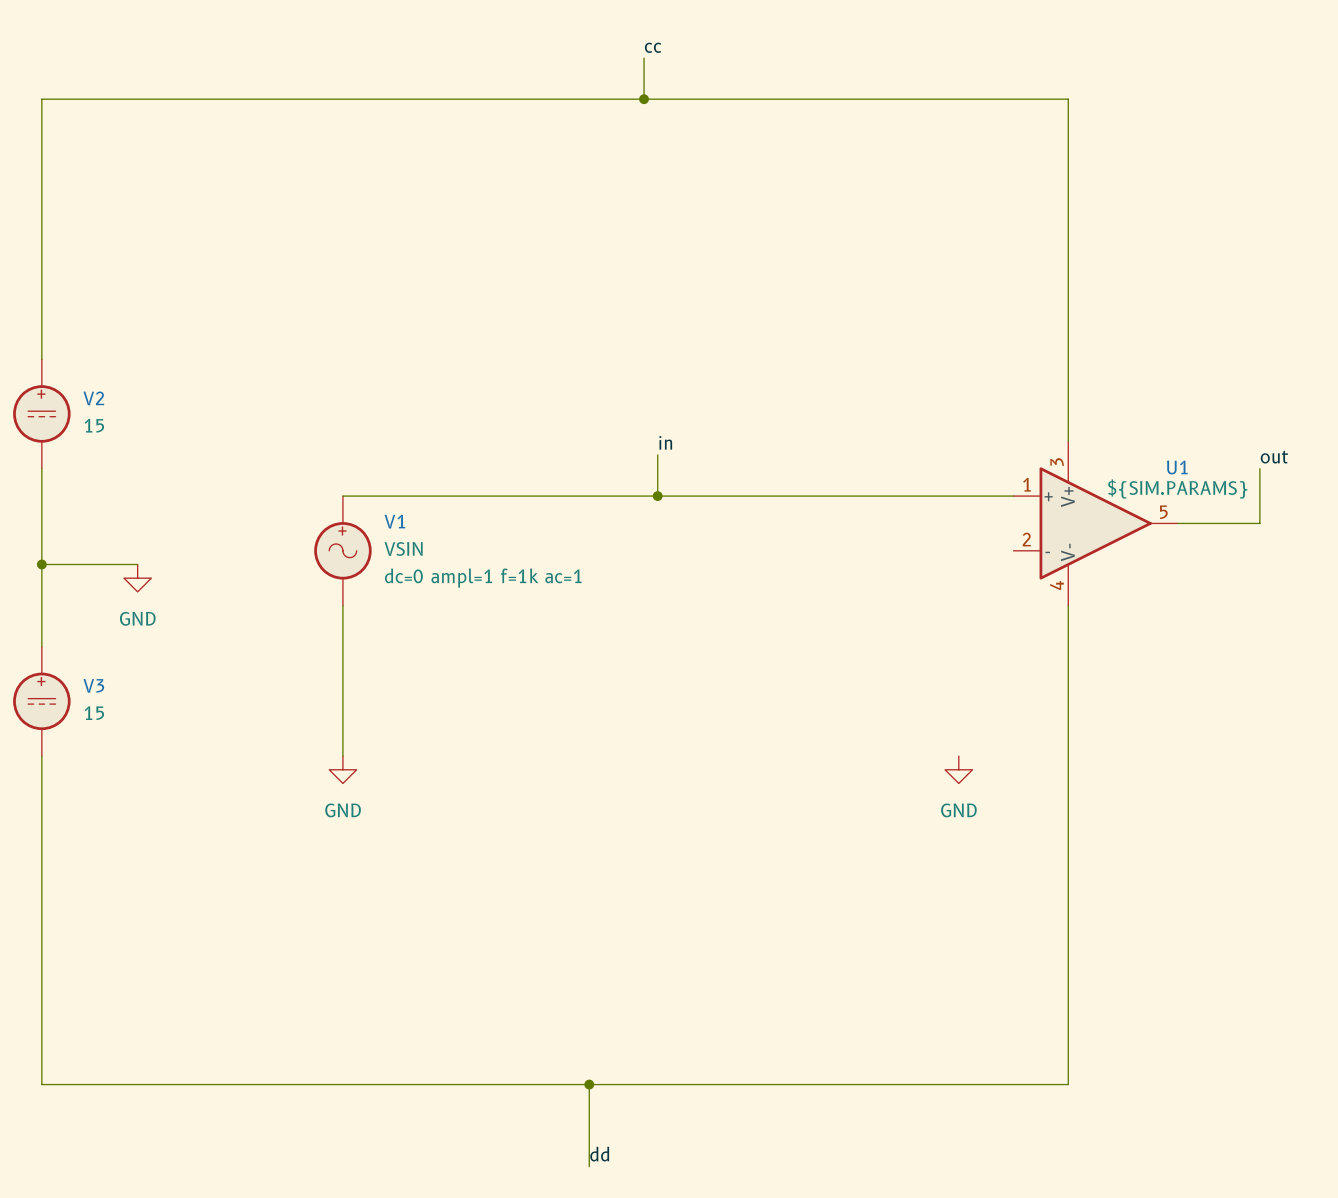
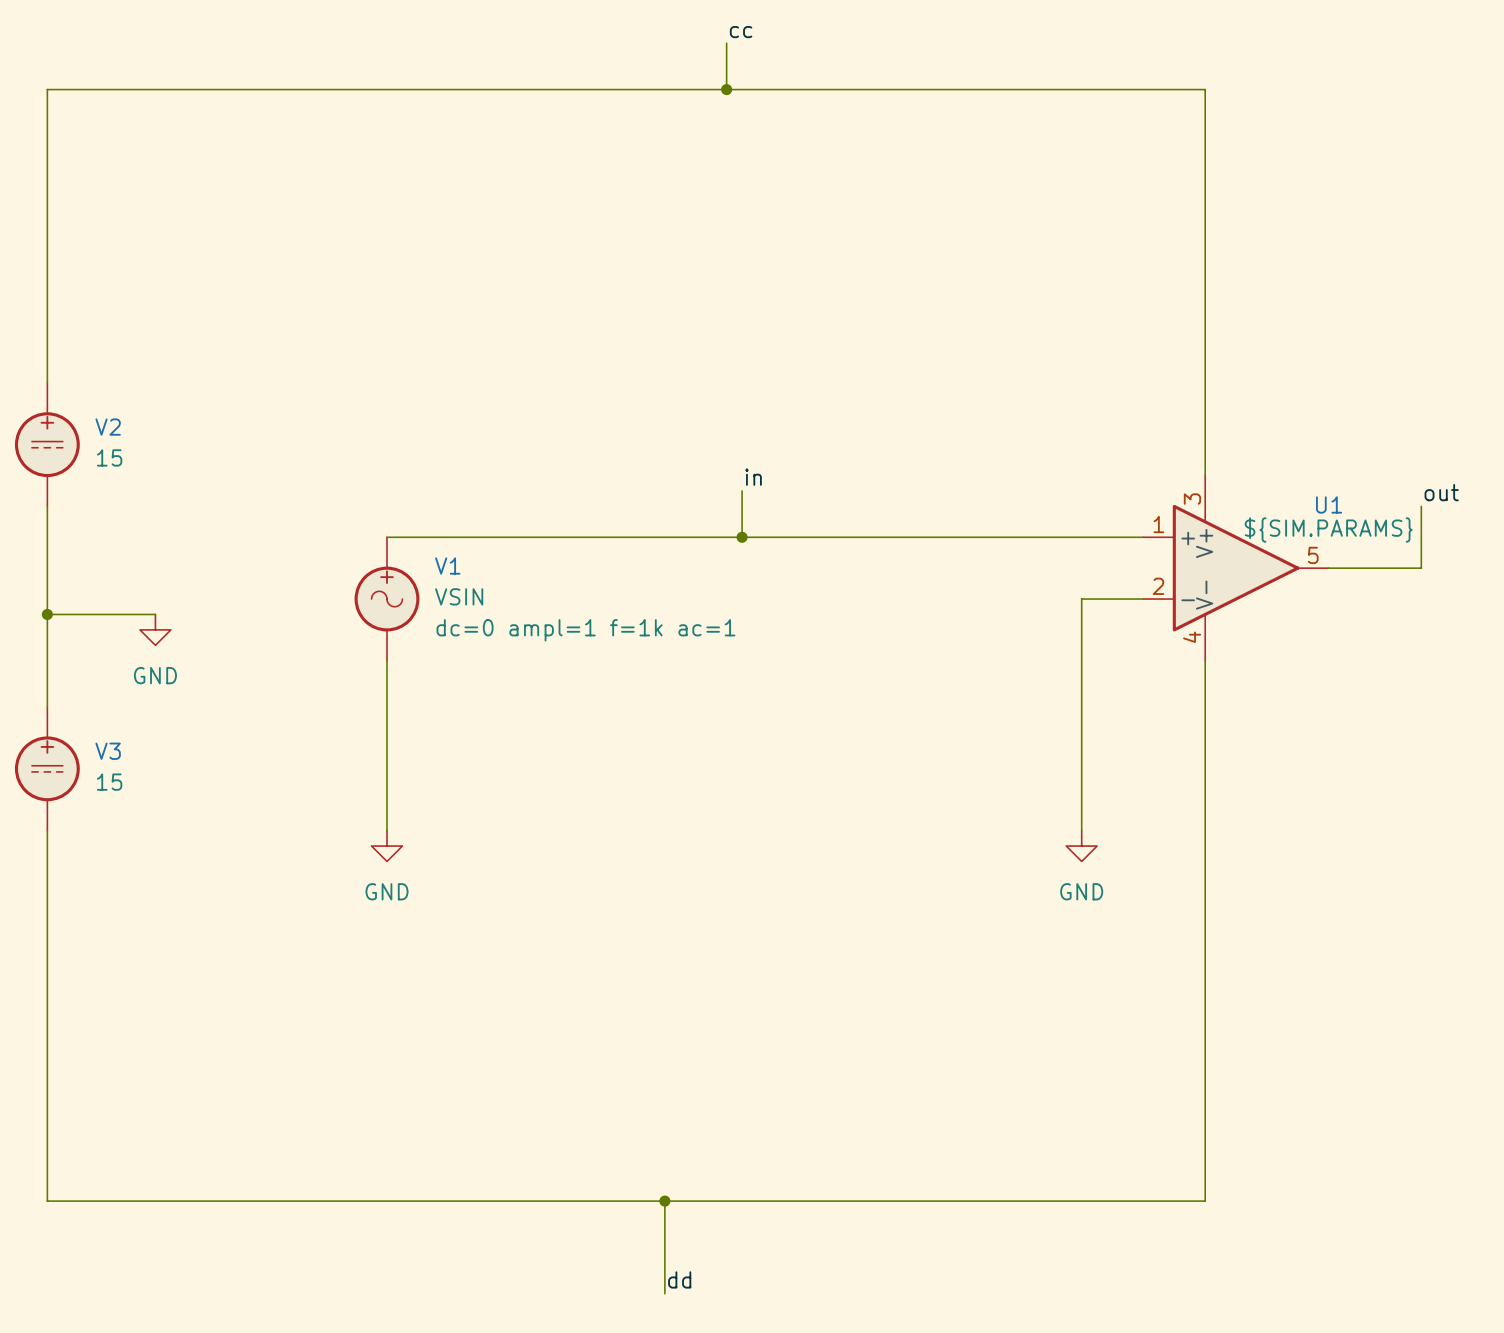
wire: none -> (1143, 599) (1081, 599) (1081, 830)

